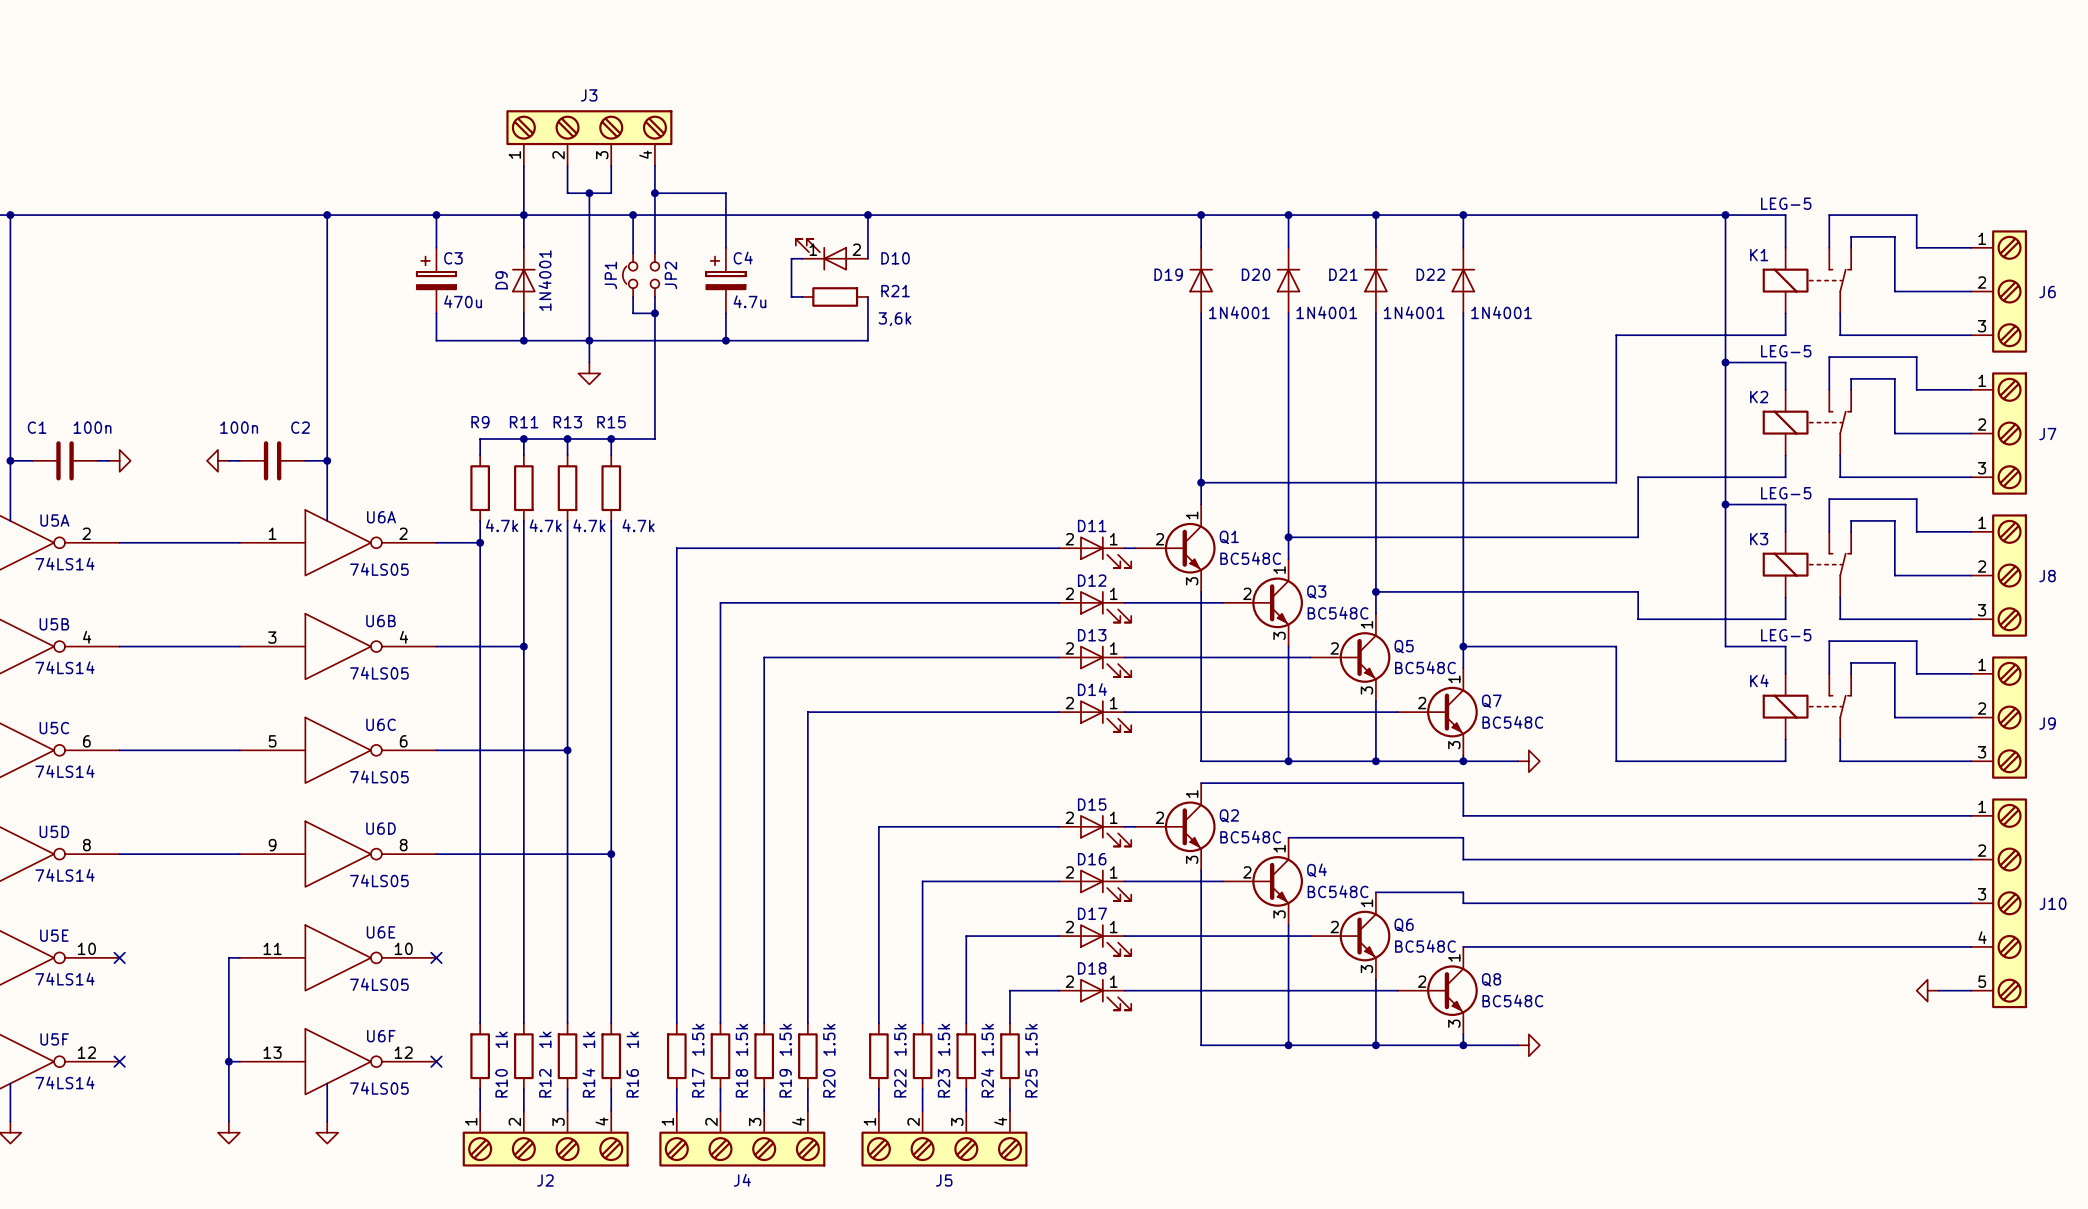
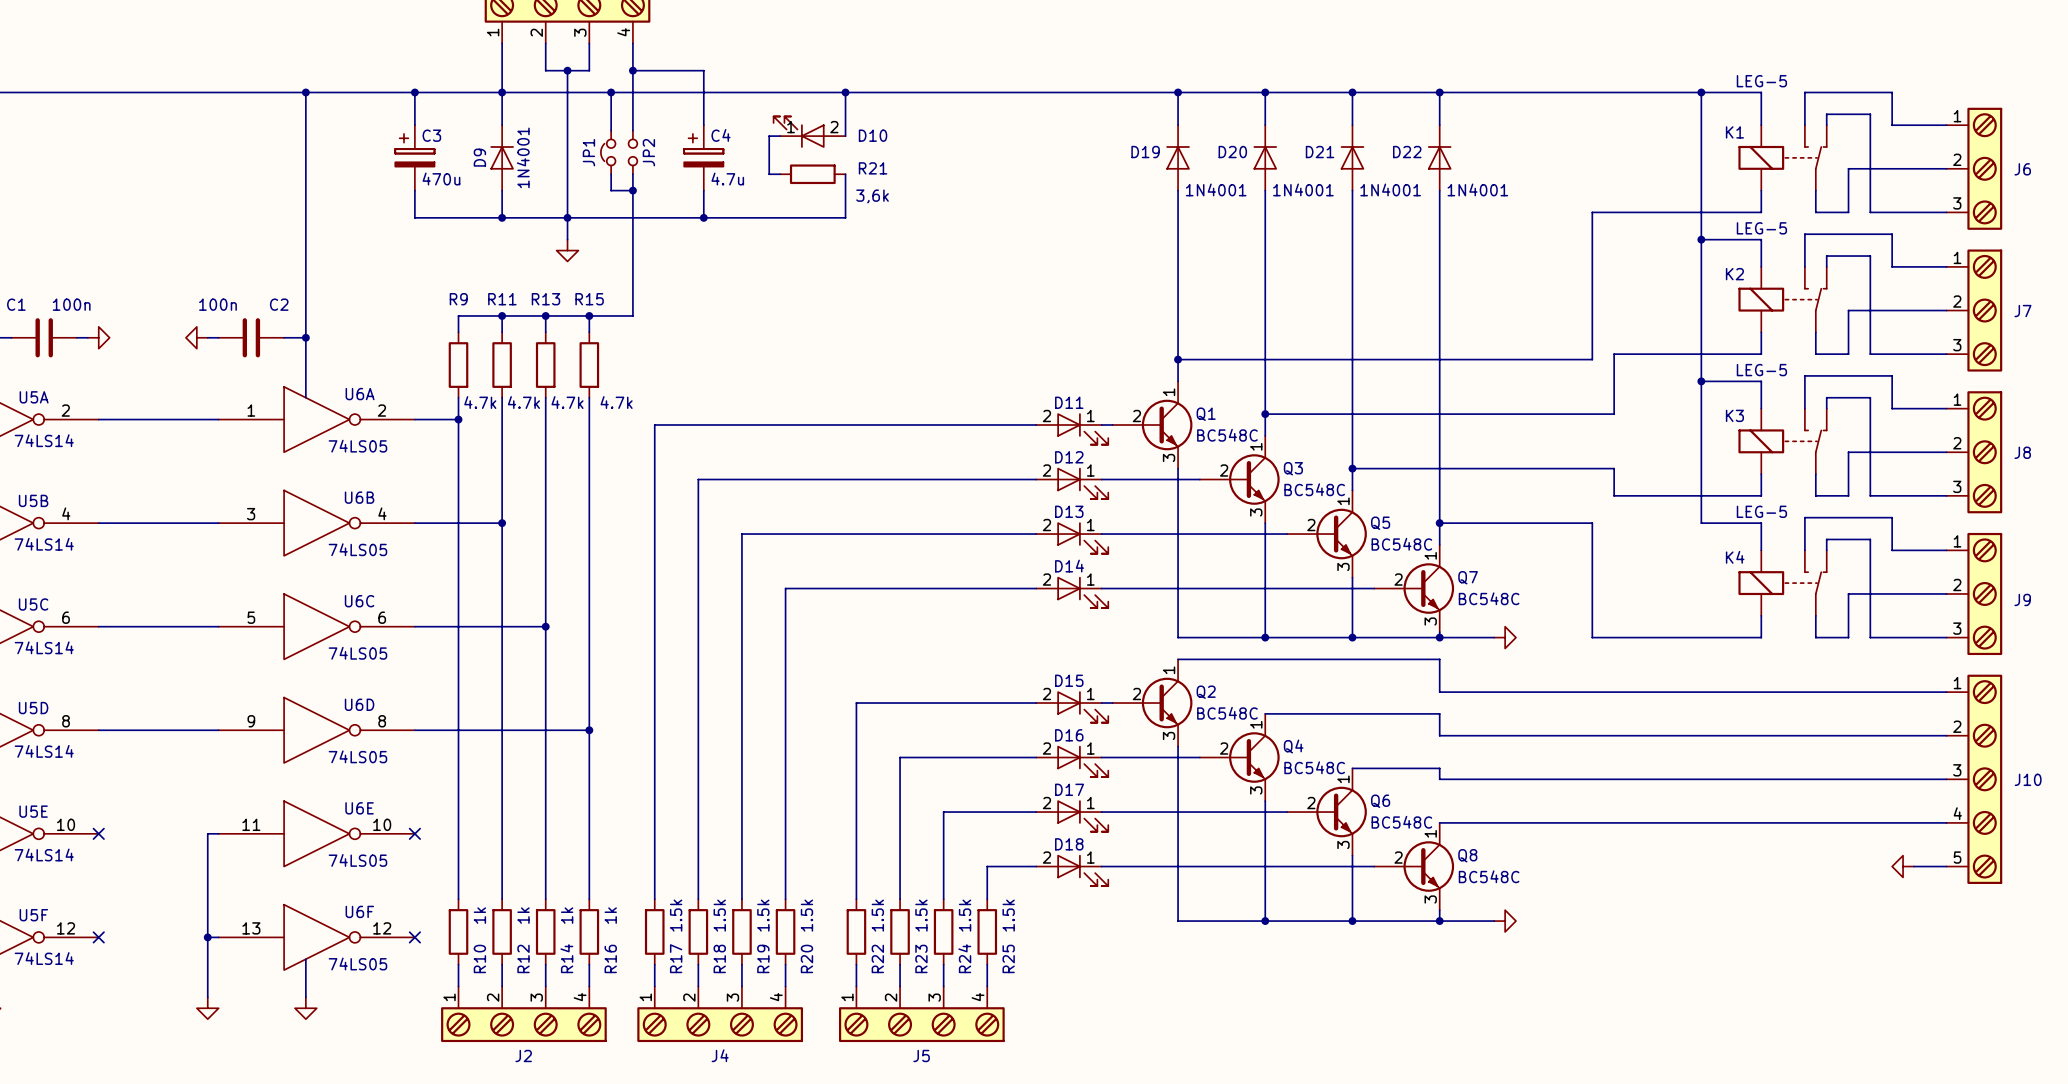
wire: (1873, 335) (1894, 335) -> (1848, 212) (1848, 168) (1870, 168) (1870, 212)
wire: (1873, 477) (1894, 477) -> (1848, 354) (1848, 310) (1870, 310) (1870, 354)
wire: (1873, 619) (1894, 619) -> (1848, 495) (1848, 452) (1870, 452) (1870, 495)
wire: (1873, 761) (1894, 761) -> (1848, 637) (1848, 593) (1870, 593) (1870, 637)

